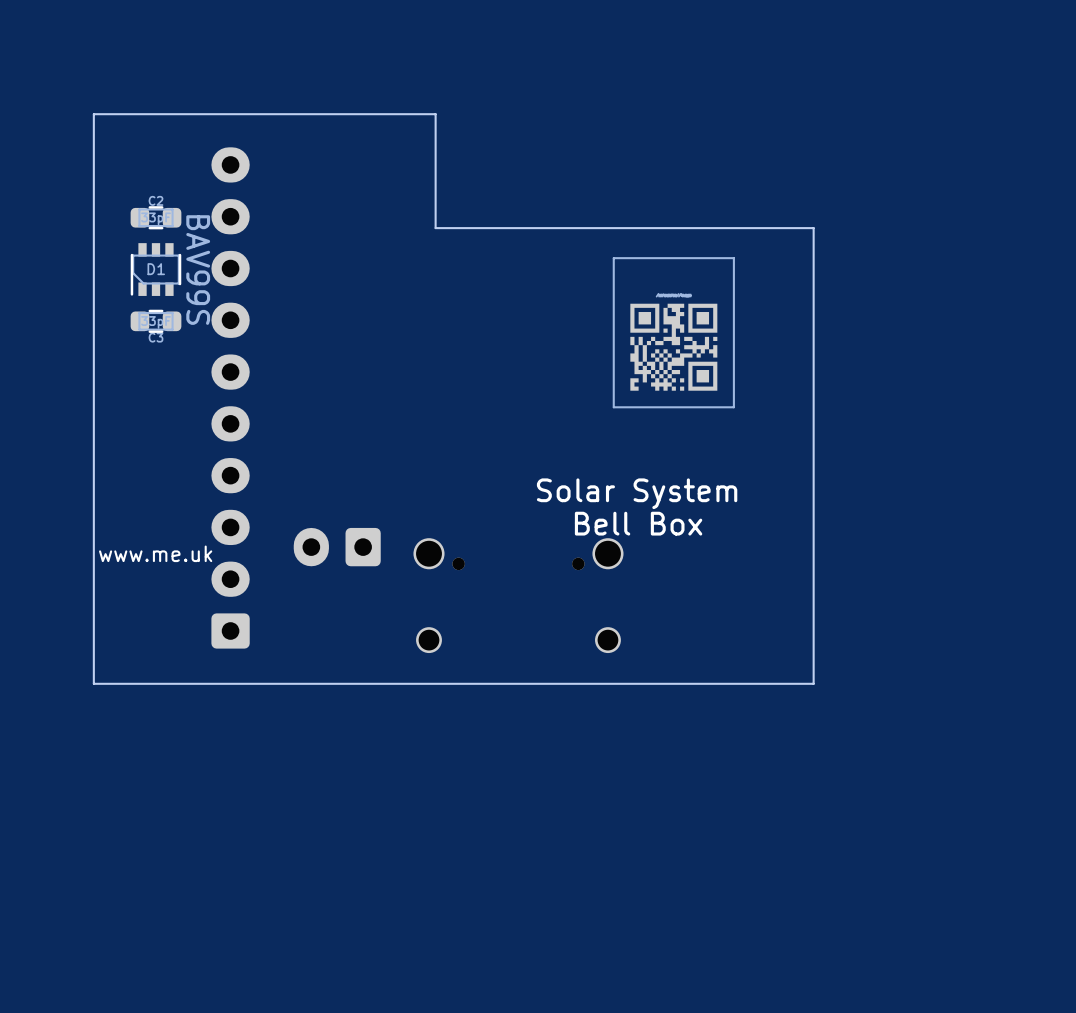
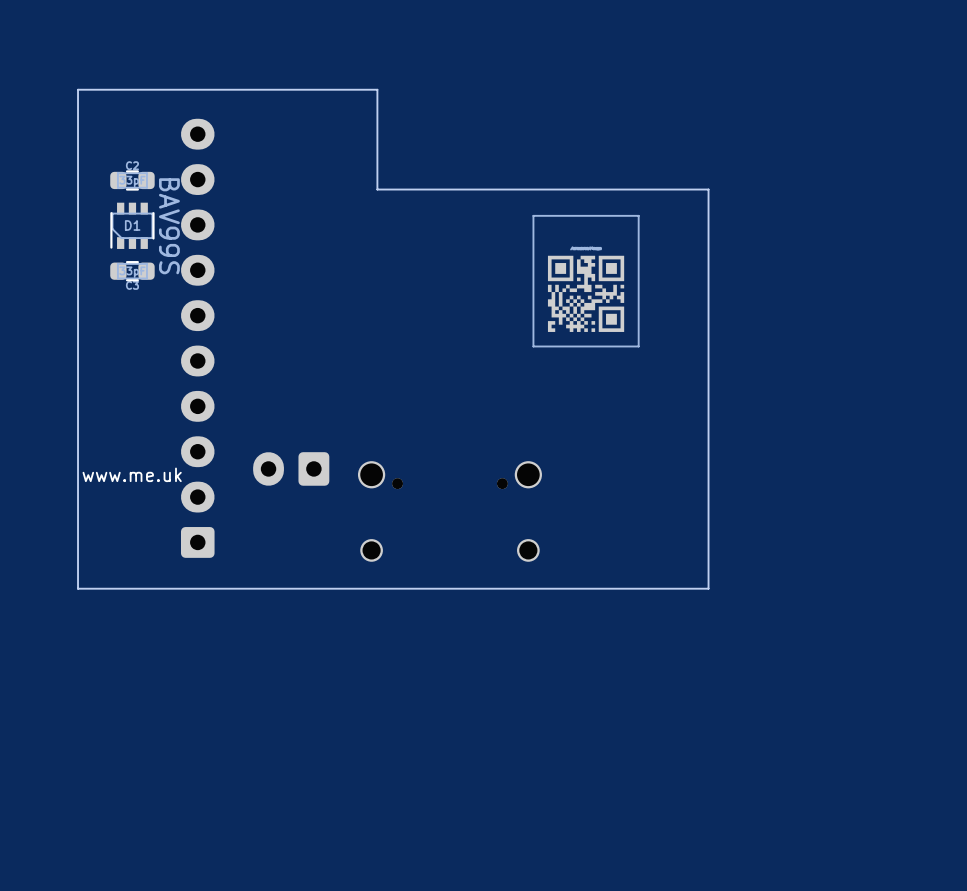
text: Solar System (637, 493) -> none
text: Bell Box (638, 523) -> none

